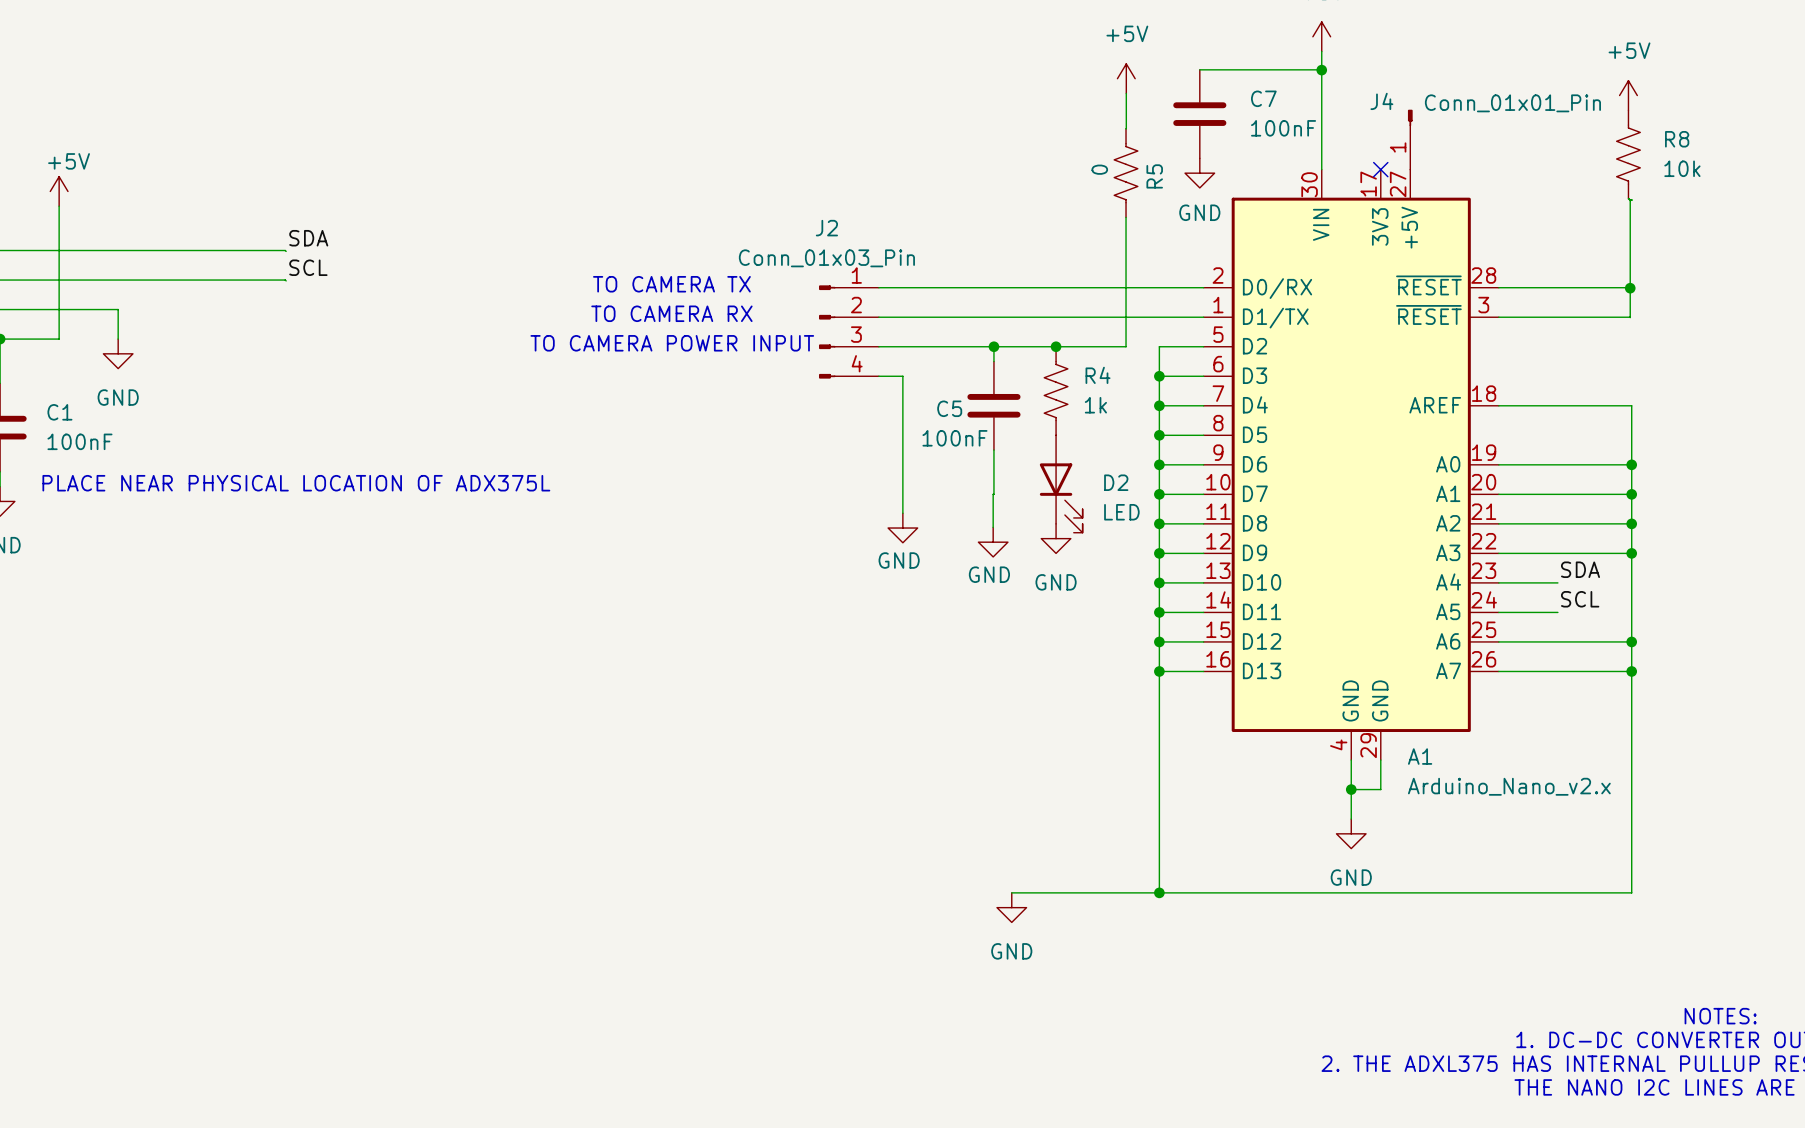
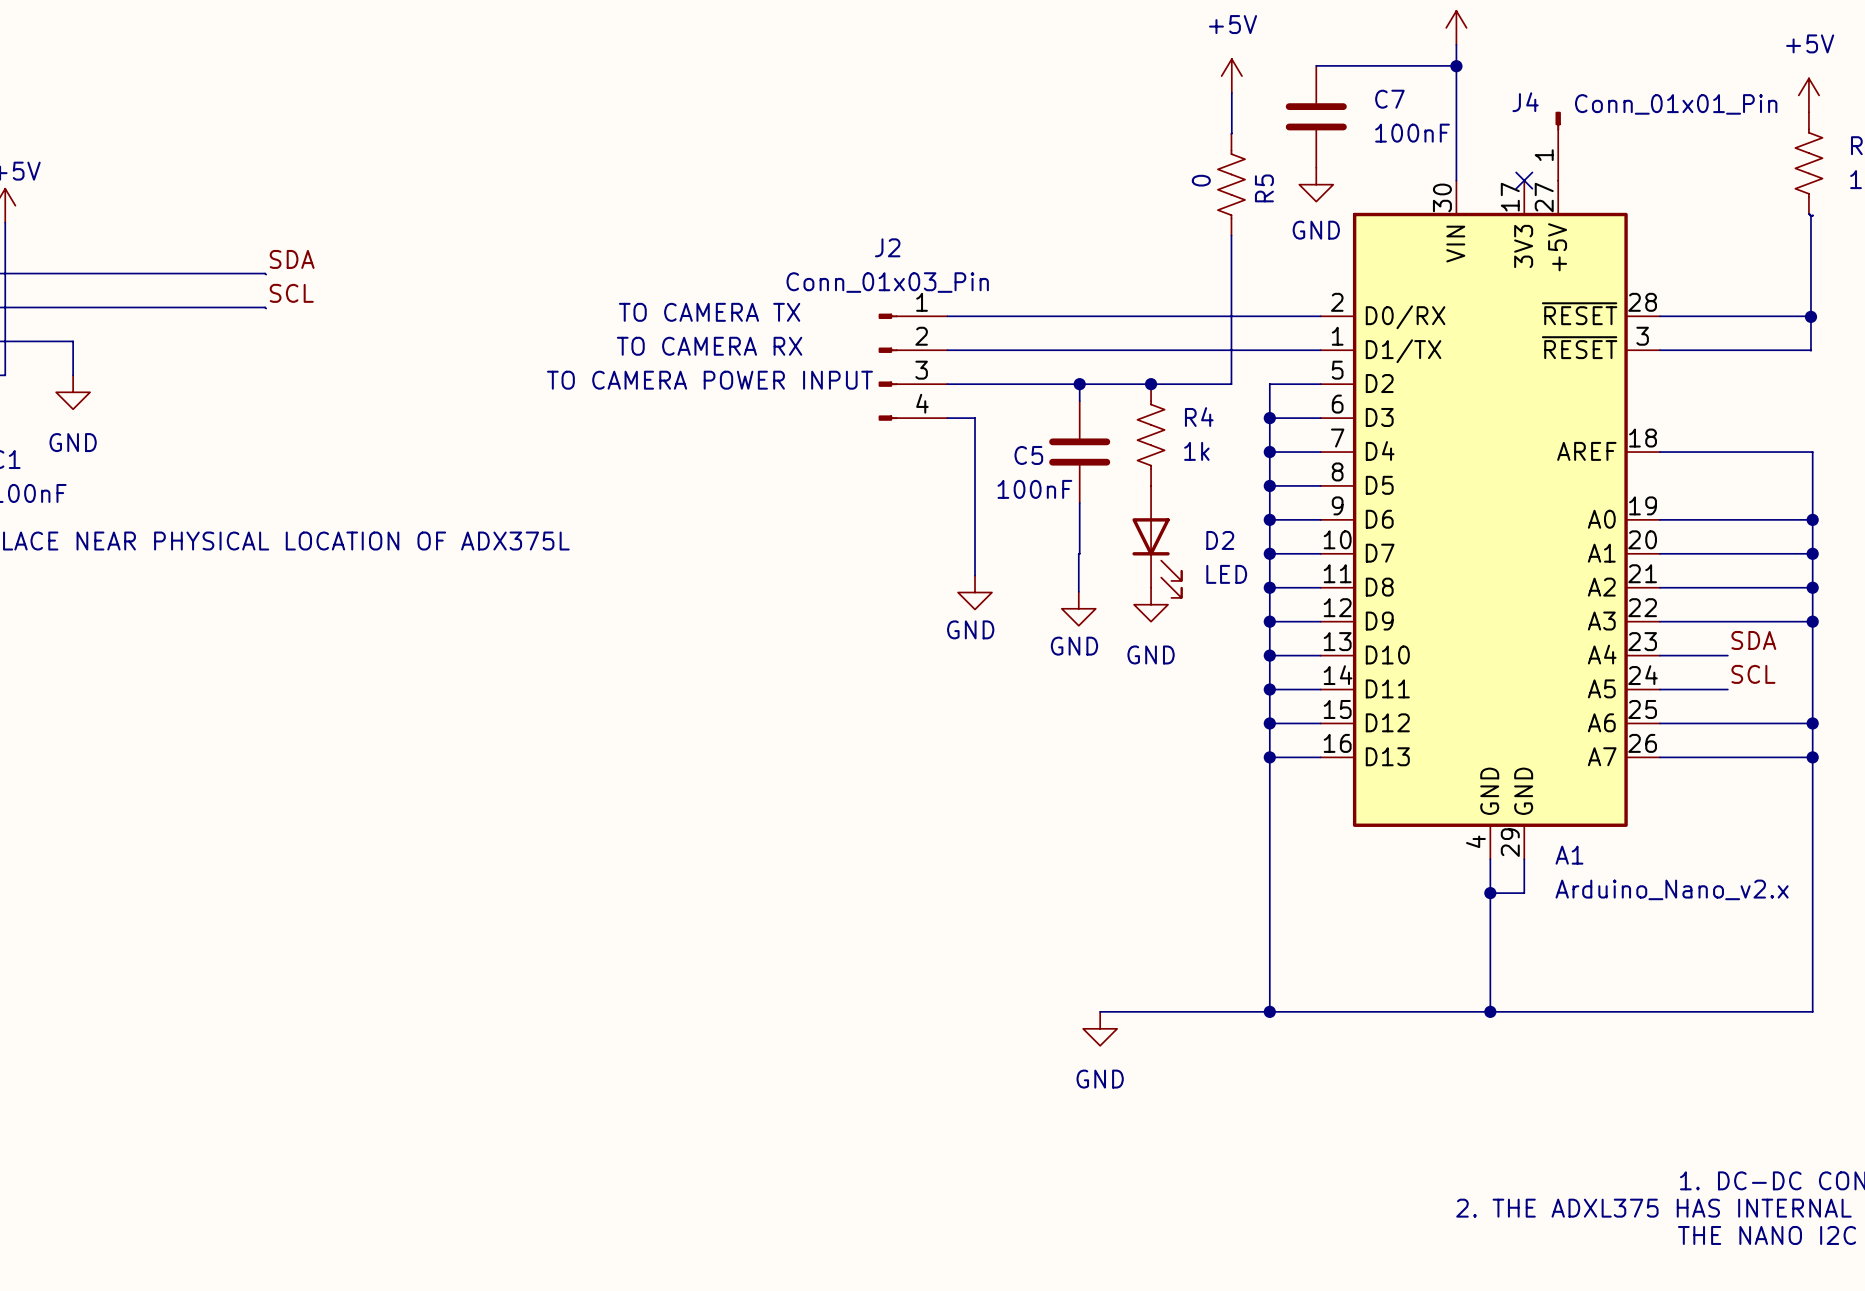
wire: none -> (1490, 927) (1490, 1011)
power symbol: GND (1351, 833) -> none
junction: none -> (1490, 1011)

